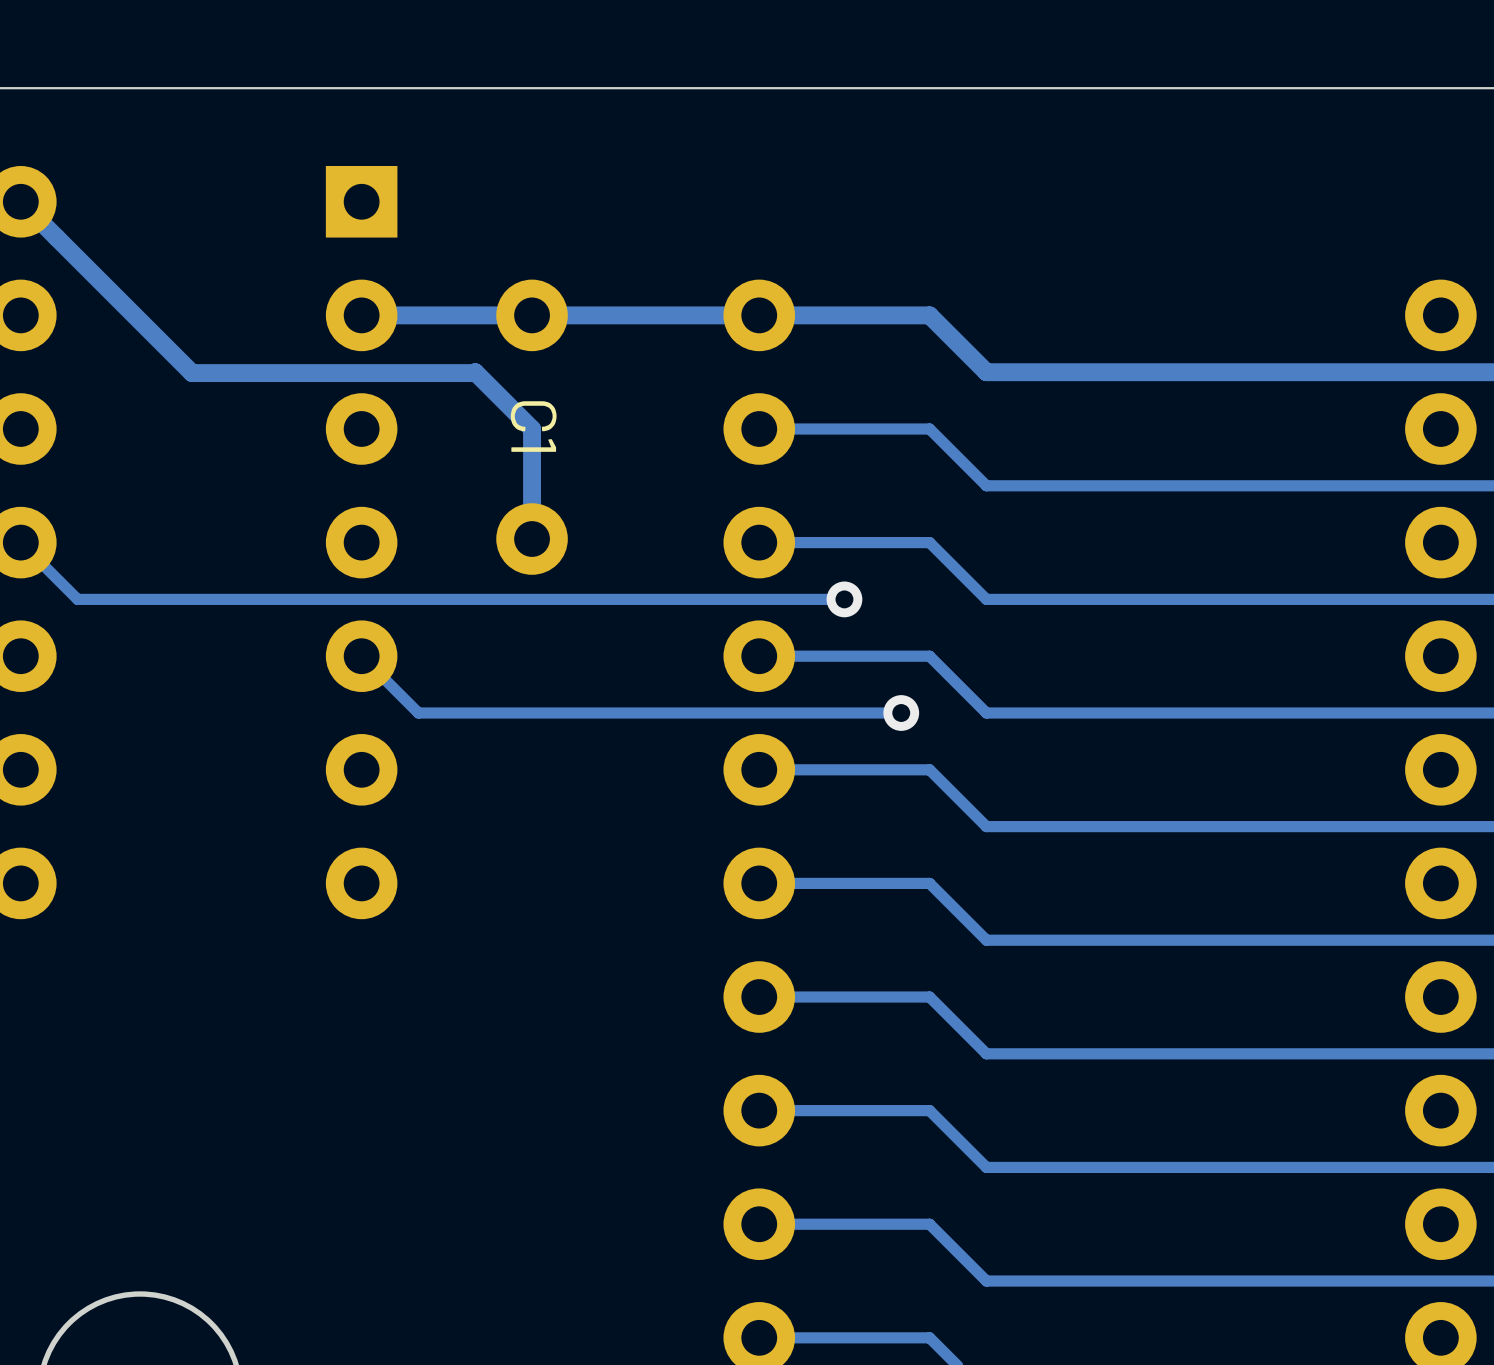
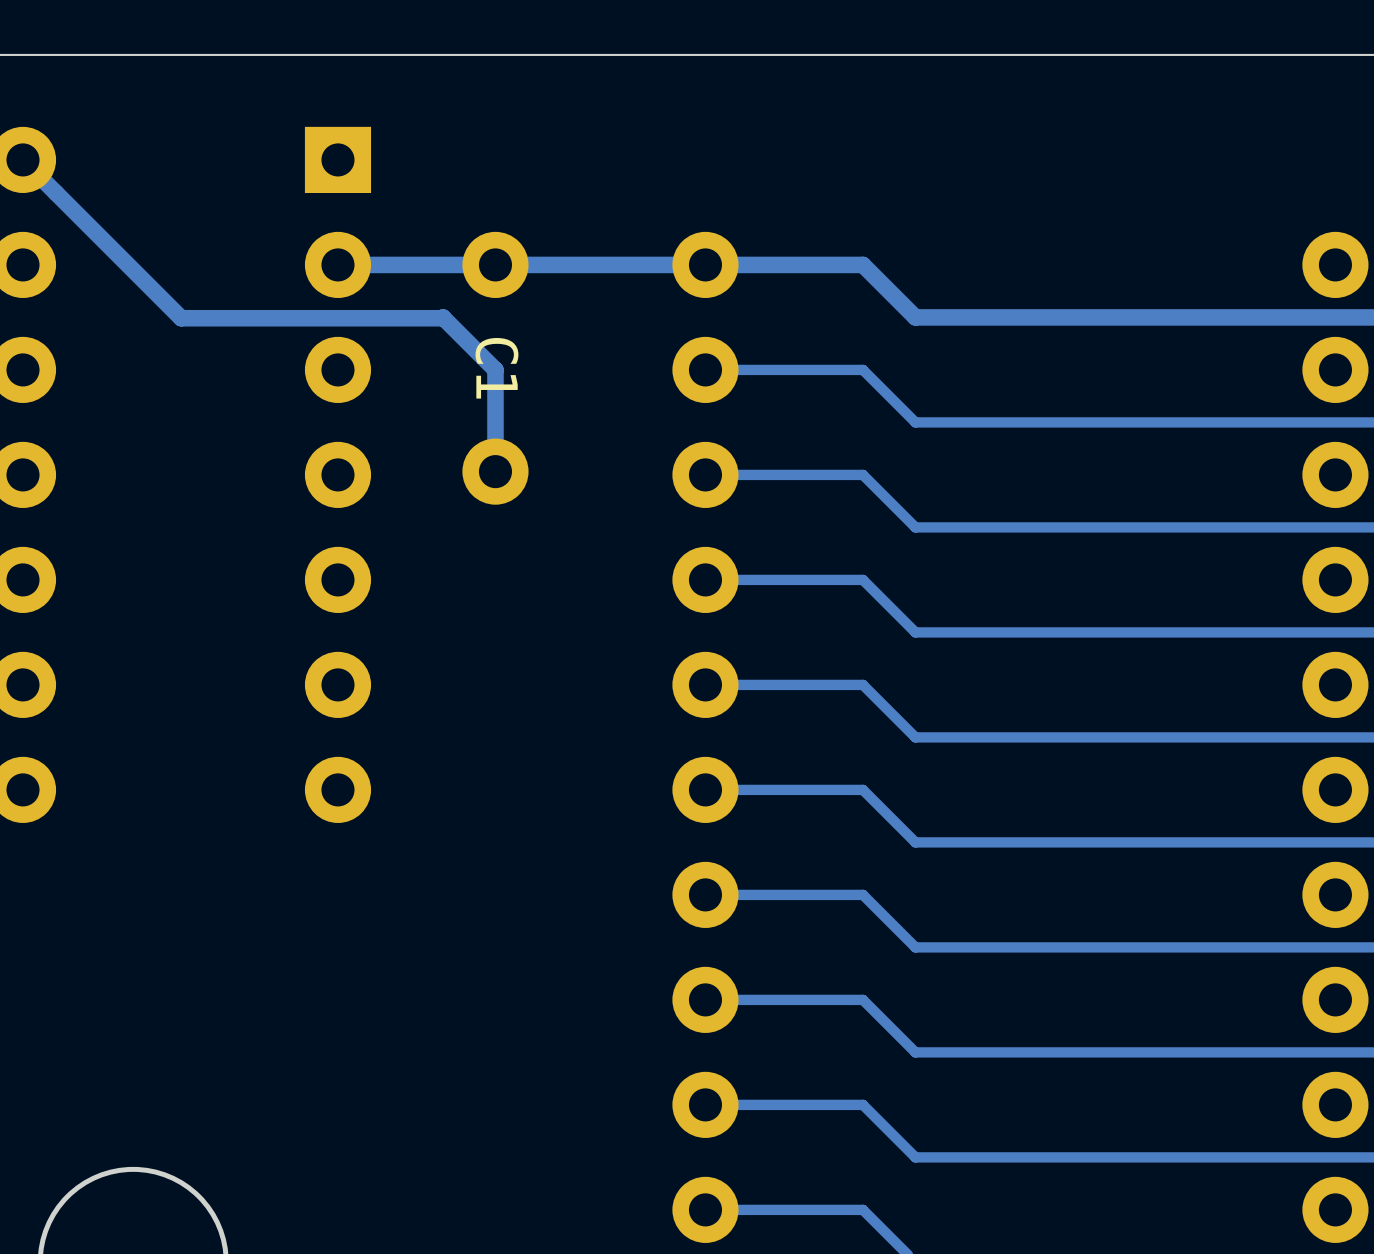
track: (20, 542) (77, 599) (844, 599) -> none
via: (844, 599) -> none
track: (361, 656) (418, 713) (901, 713) -> none
via: (901, 713) -> none

